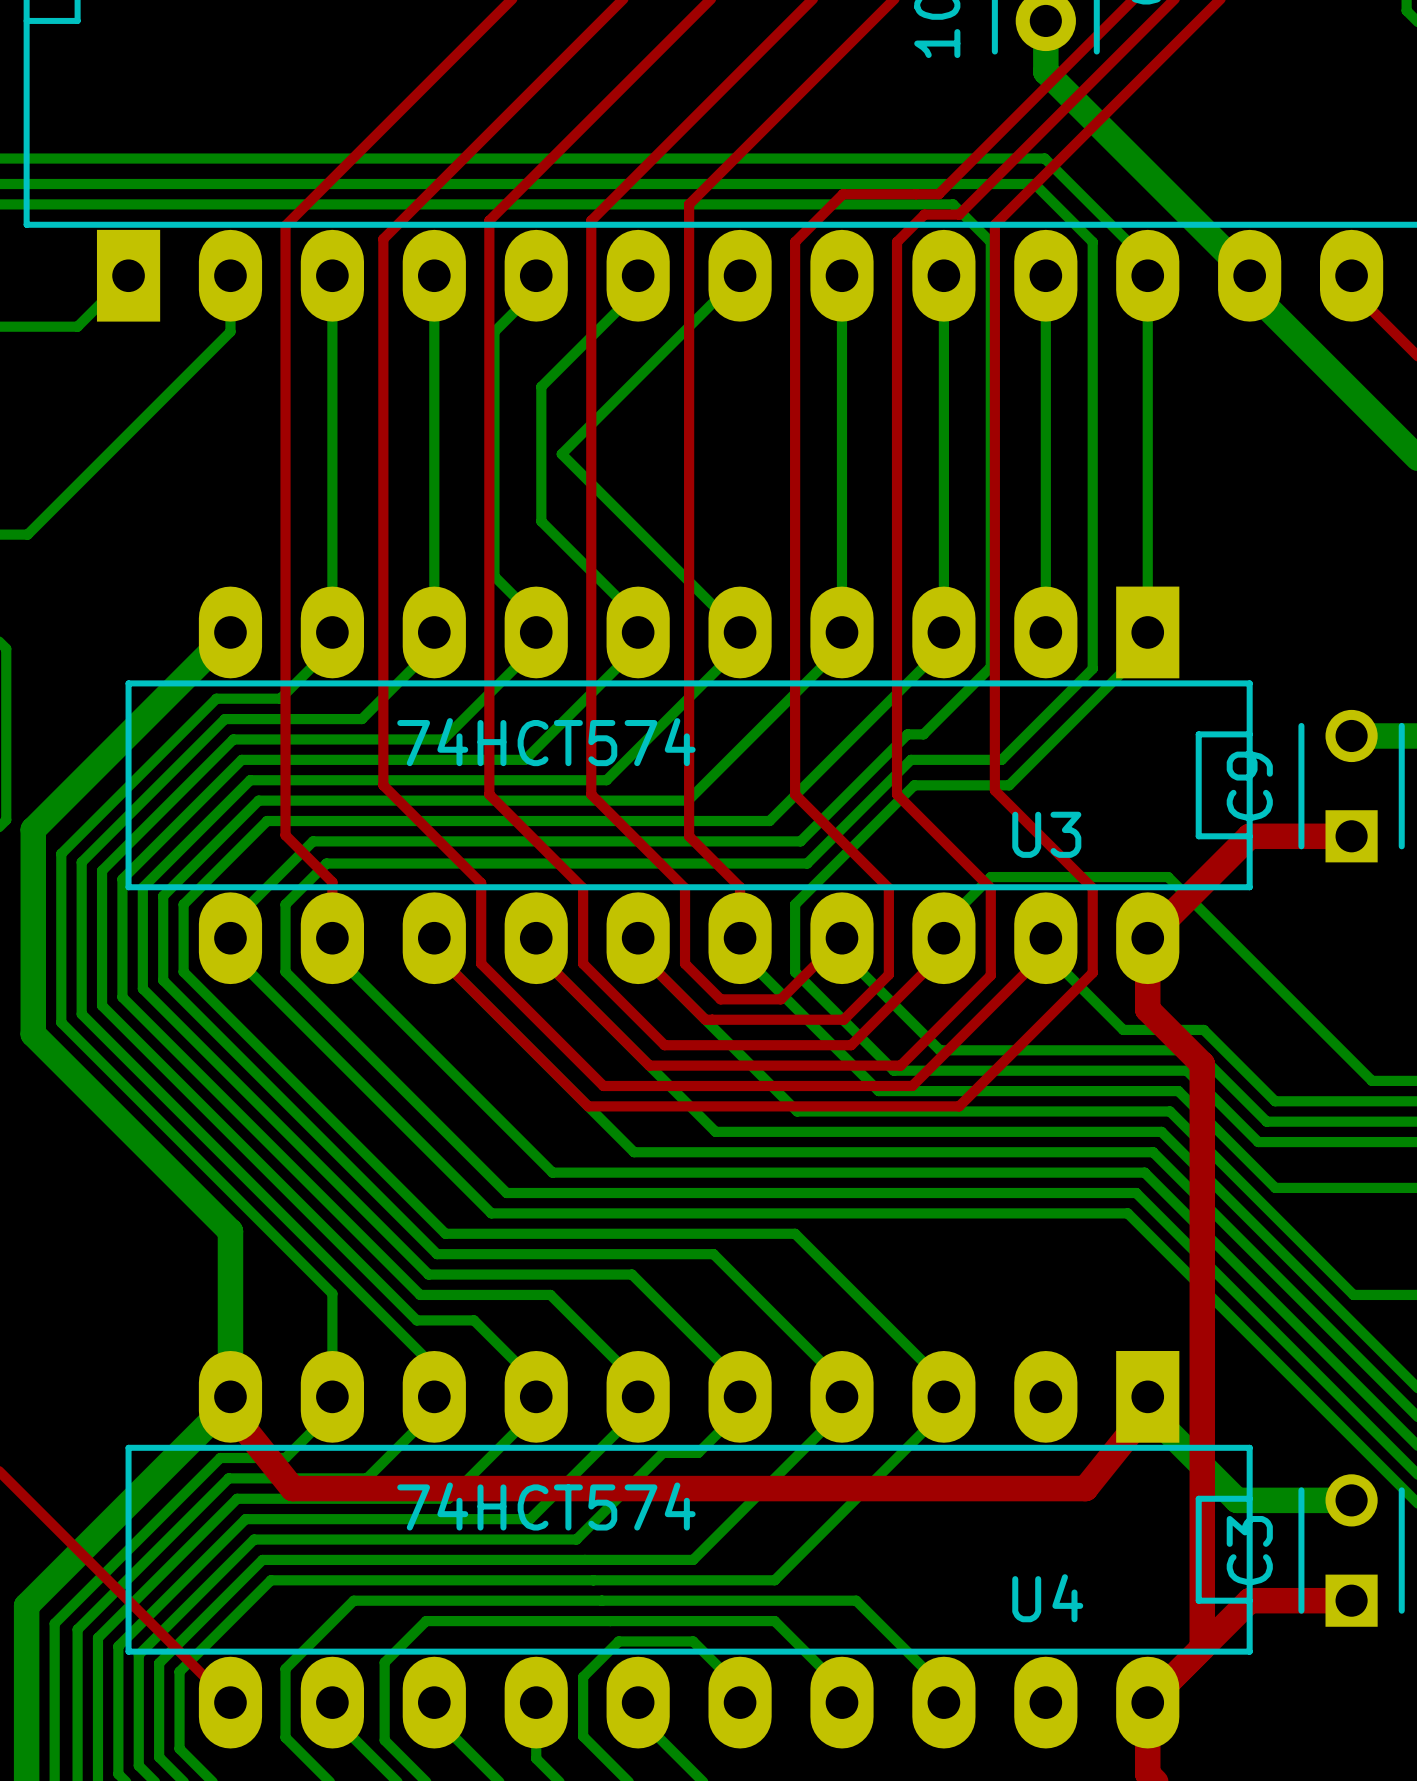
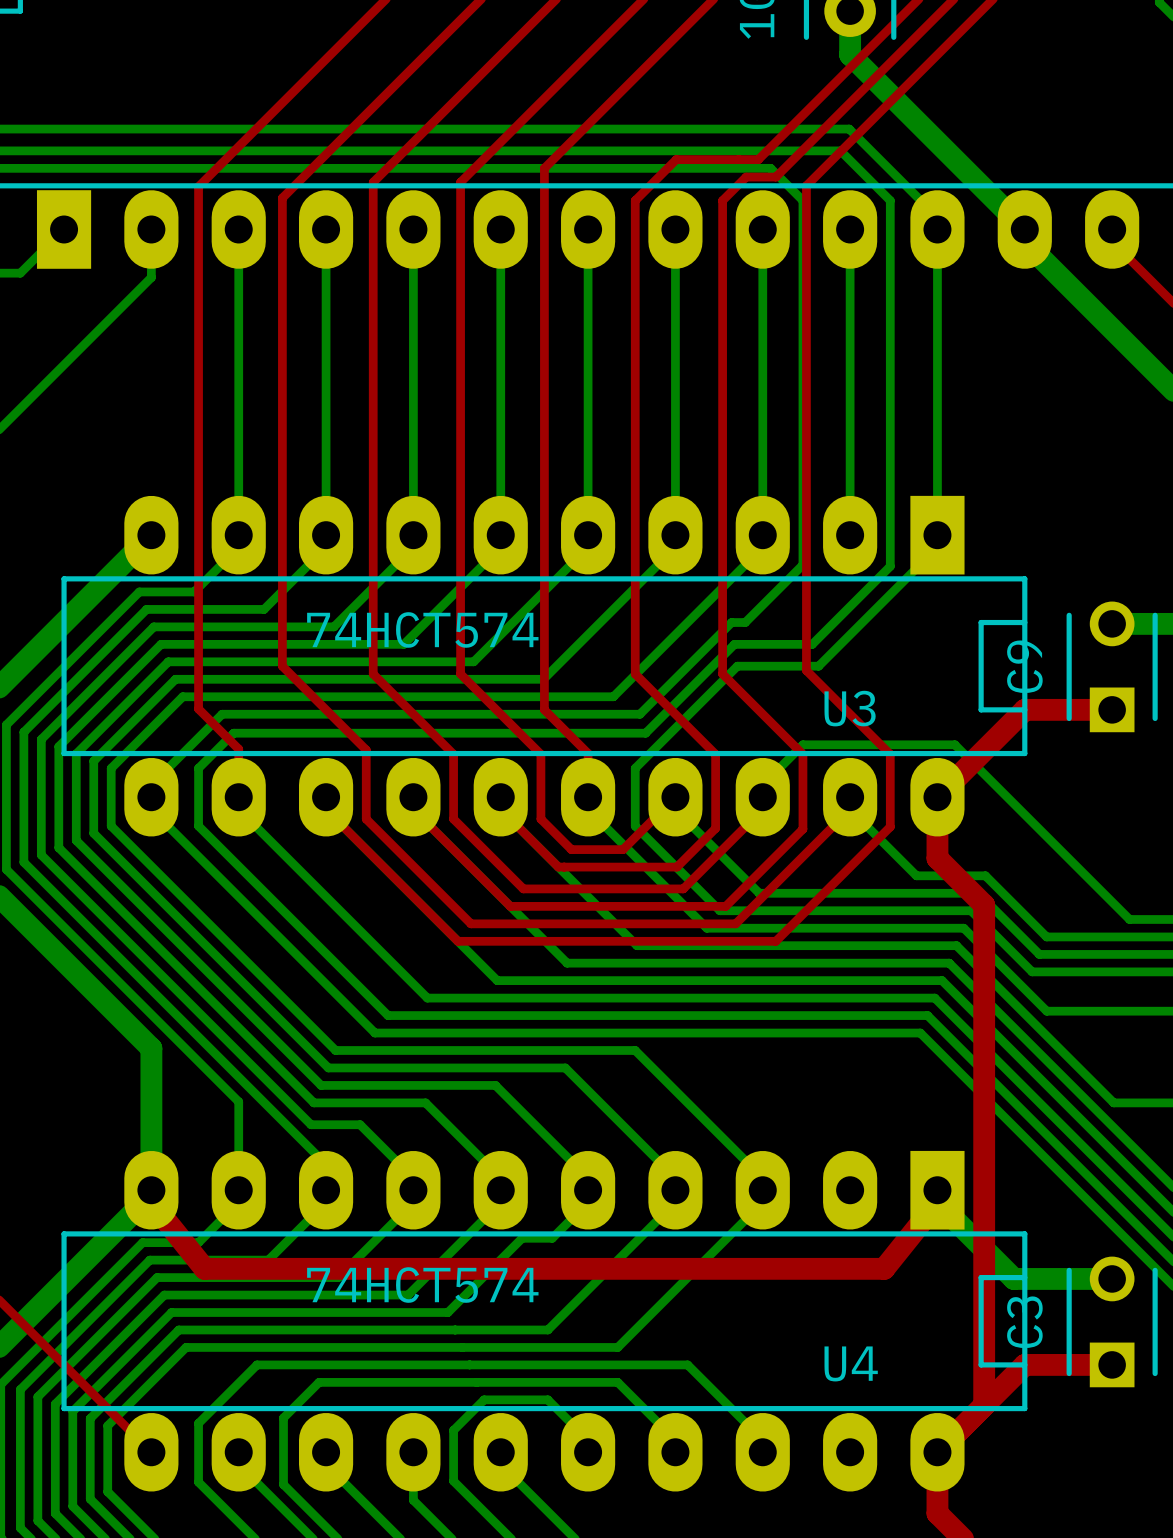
bottom track: (740, 275) (561, 454) (740, 632) -> (588, 229) (588, 535)
bottom track: (536, 290) (494, 331) (494, 576) (536, 618) -> (413, 241) (413, 522)
bottom track: (638, 290) (541, 386) (541, 521) (638, 618) -> (500, 241) (500, 522)

